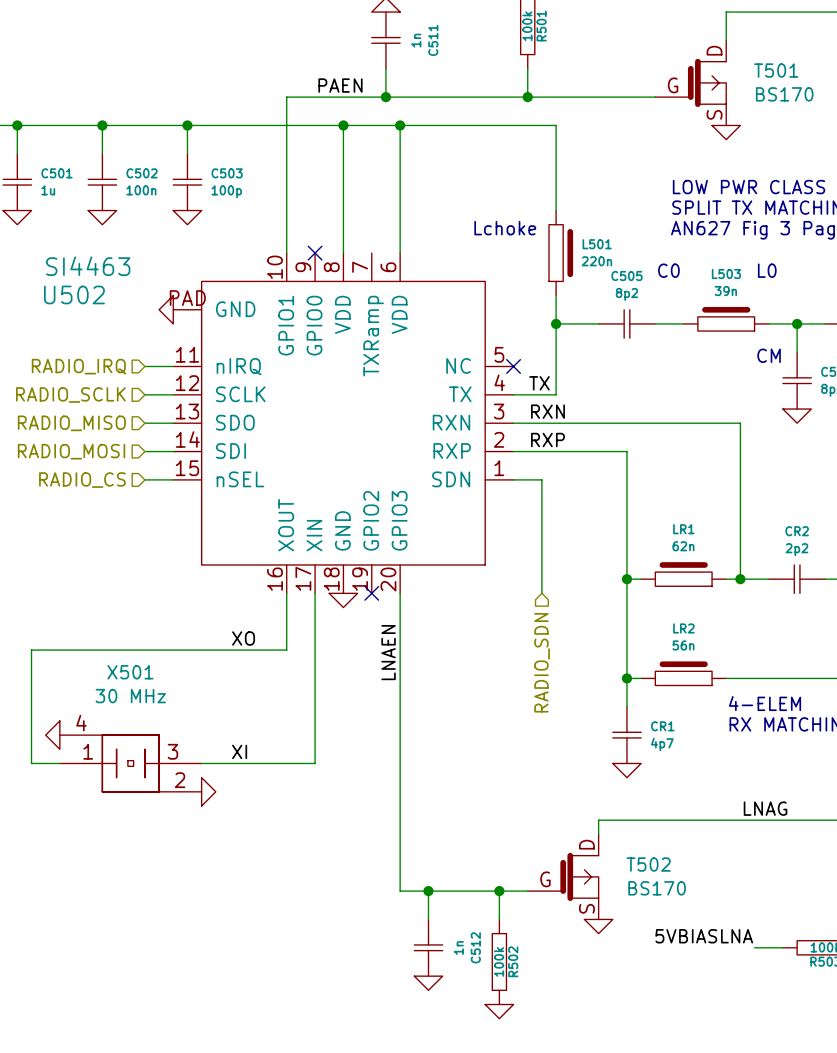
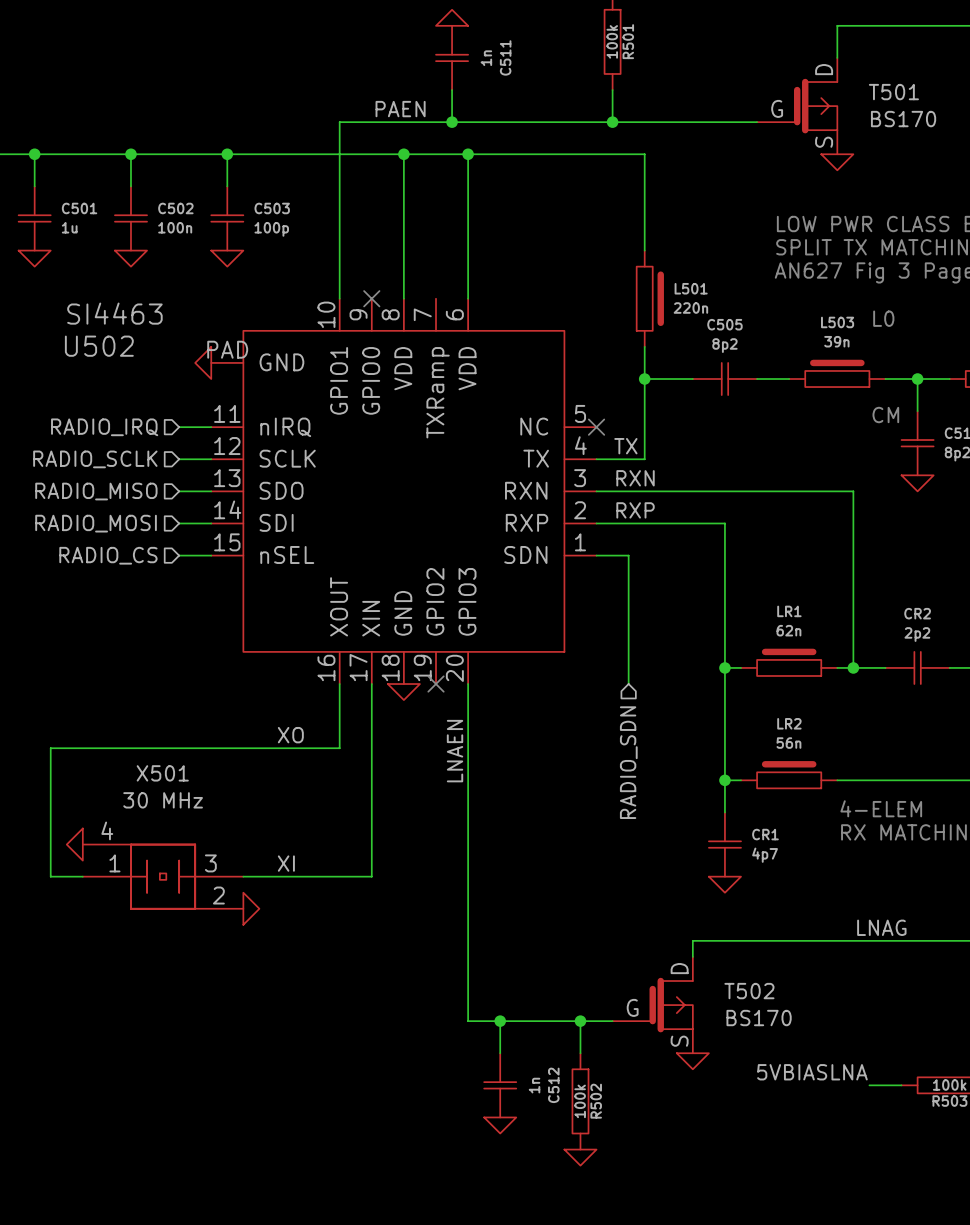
text: Lchoke (505, 228) -> none
text: C0 (668, 270) -> none

